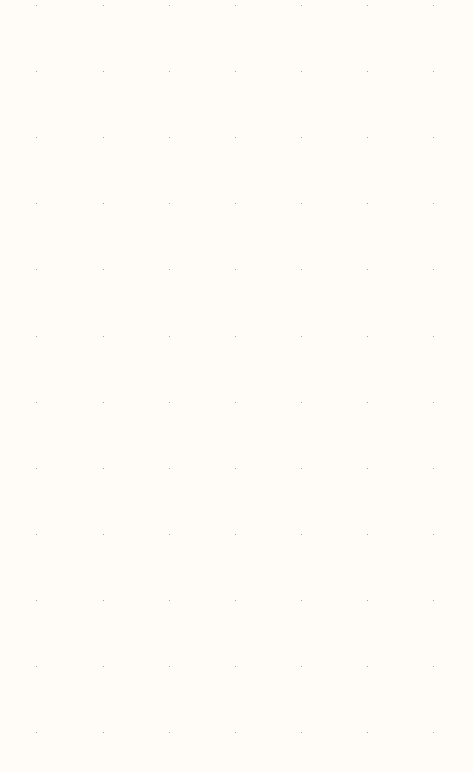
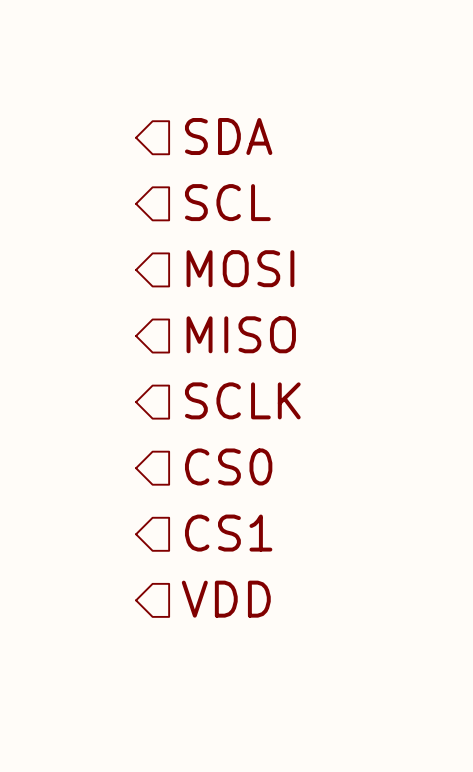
hierarchical label: none -> SDA (228, 136)
hierarchical label: none -> SCL (227, 202)
hierarchical label: none -> MOSI (240, 268)
hierarchical label: none -> MISO (241, 334)
hierarchical label: none -> SCLK (242, 400)
hierarchical label: none -> CS0 (228, 466)
hierarchical label: none -> CS1 (228, 533)
hierarchical label: none -> VDD (226, 599)

